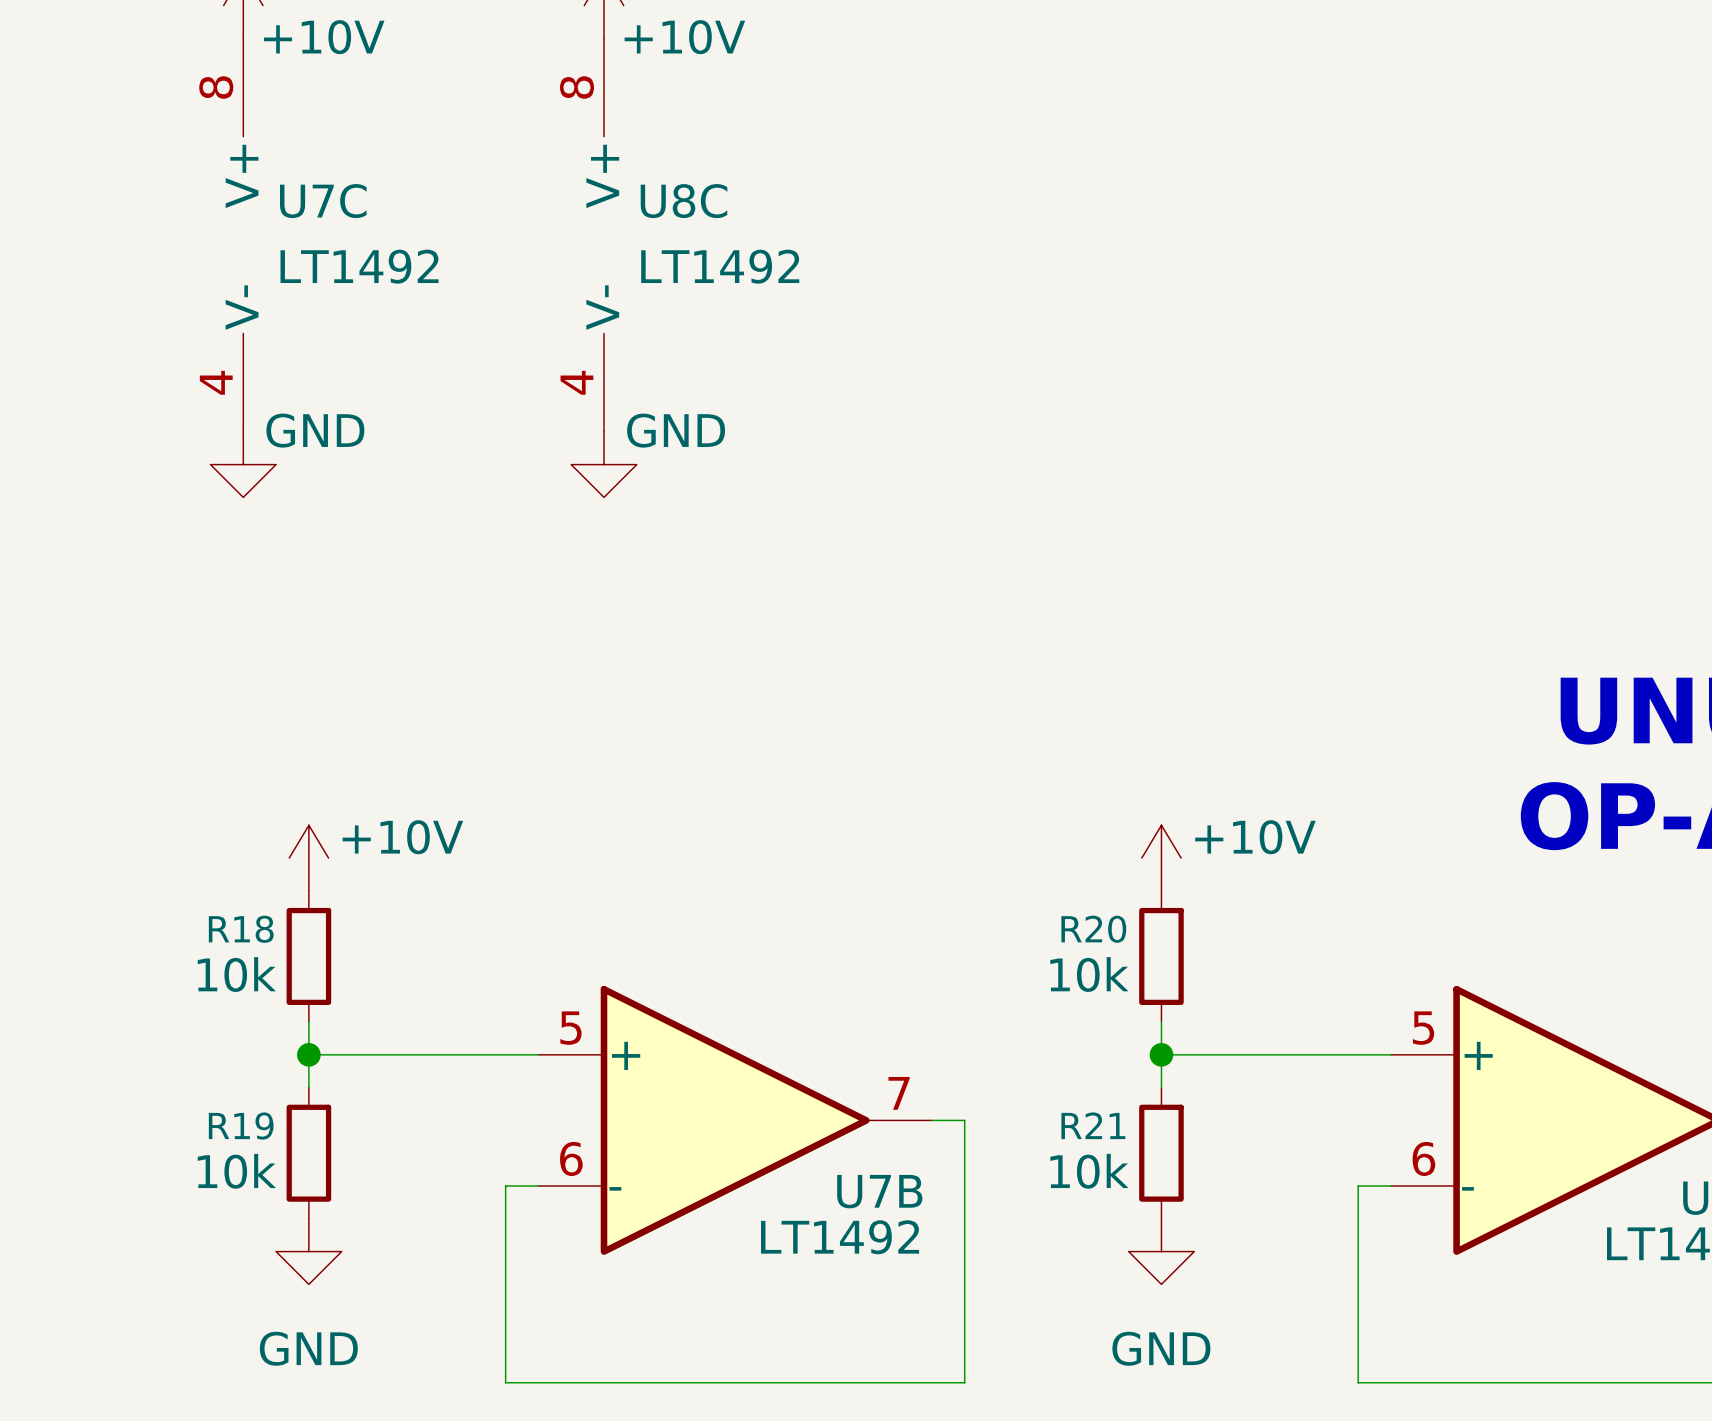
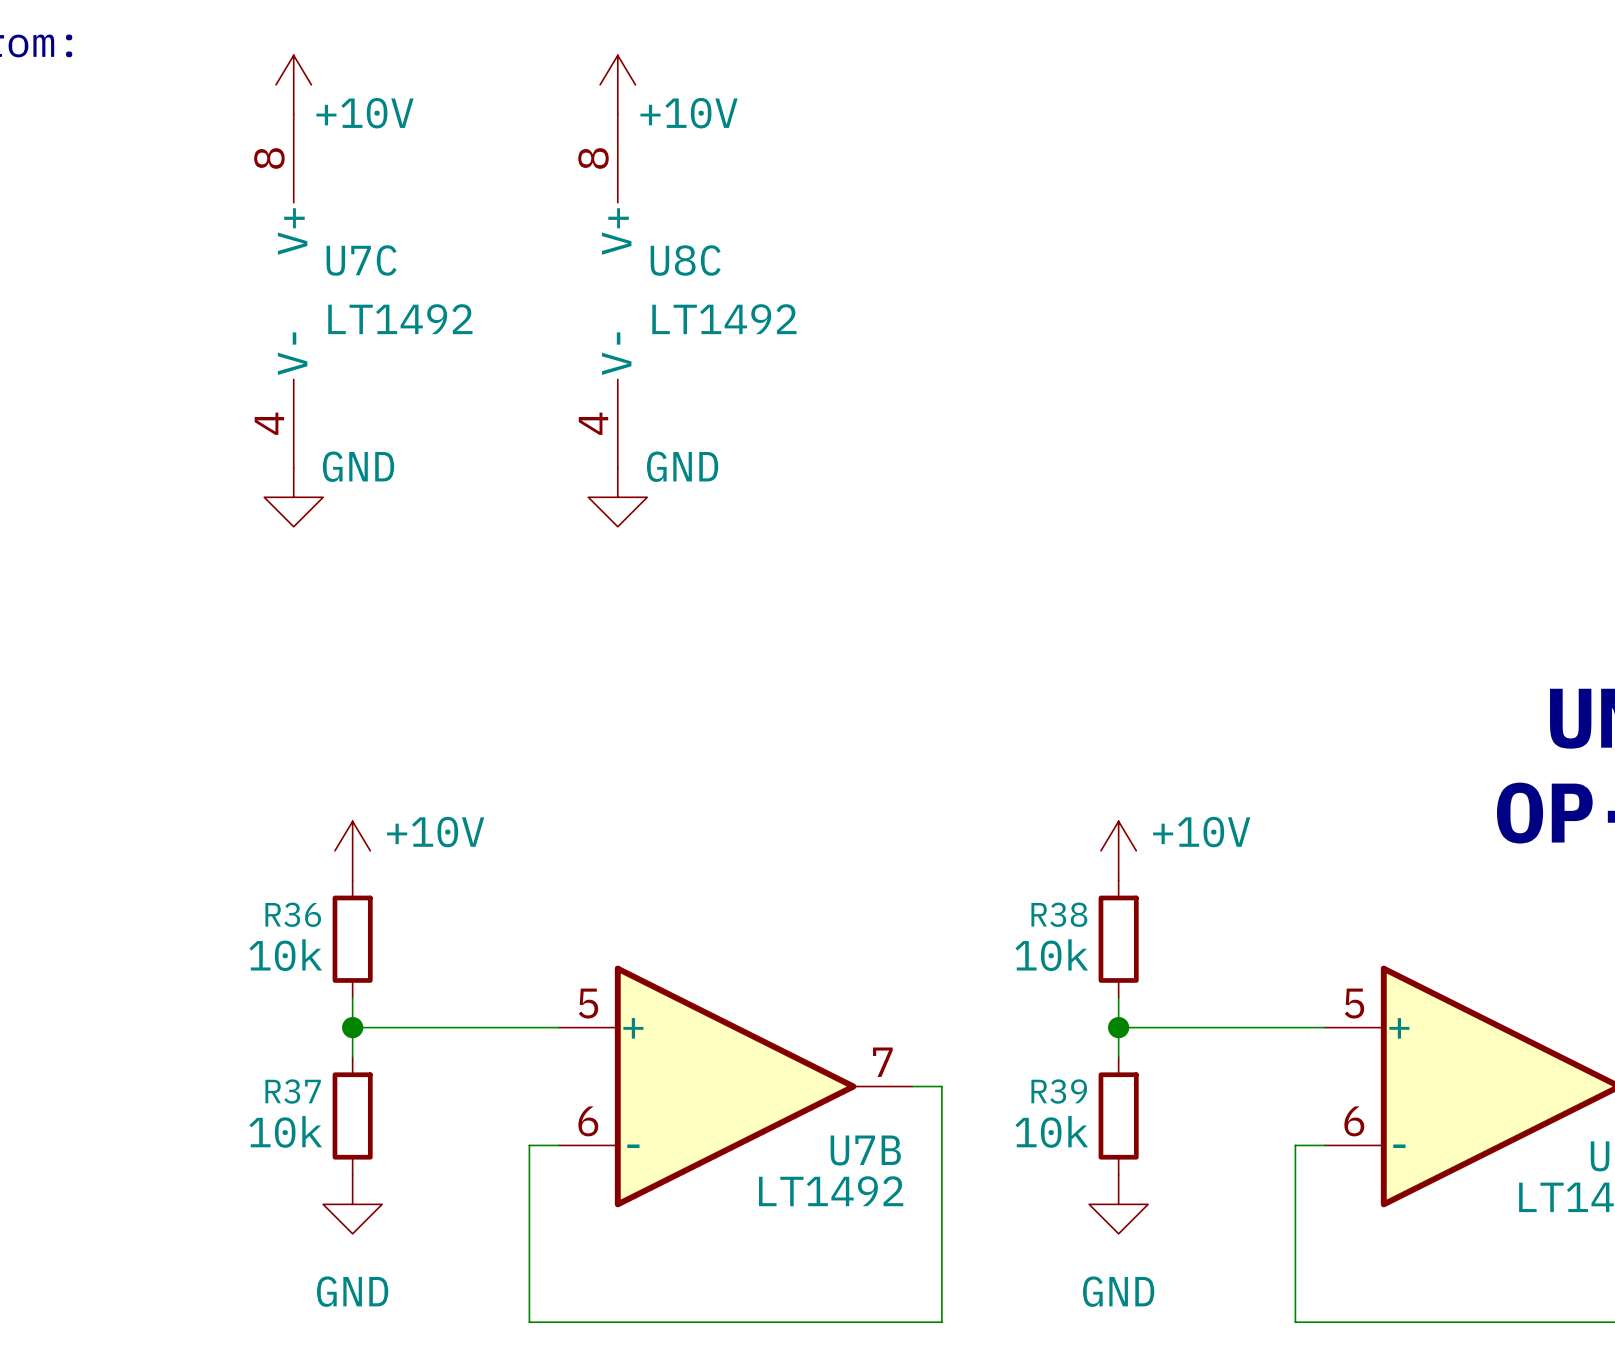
R18 name: R18 (241, 929) -> R36 (293, 914)
R20 name: R20 (1093, 929) -> R38 (1059, 914)
R21 name: R21 (1093, 1125) -> R39 (1059, 1091)
R19 name: R19 (241, 1126) -> R37 (293, 1091)

